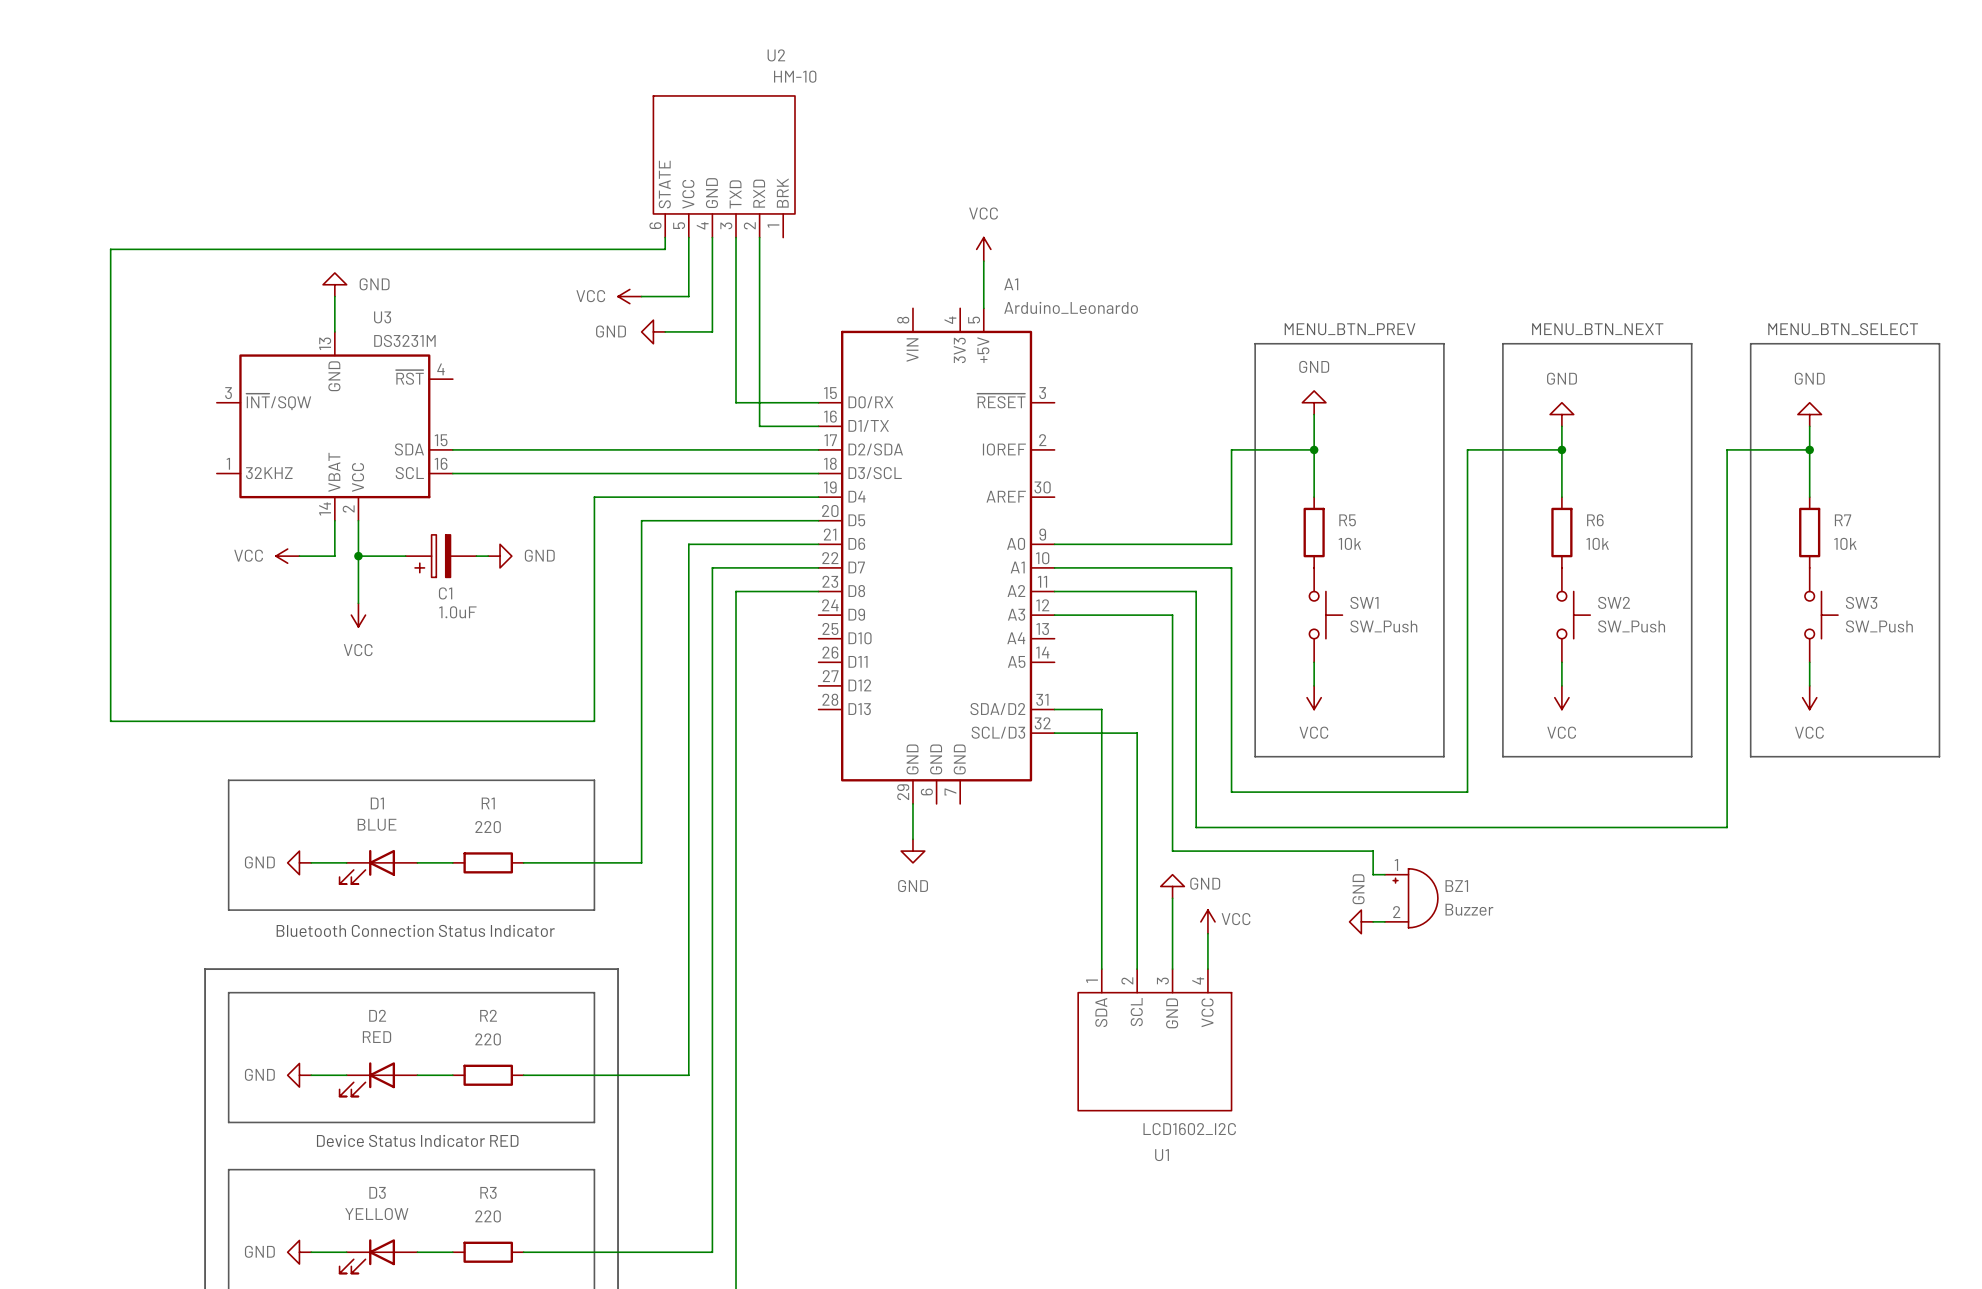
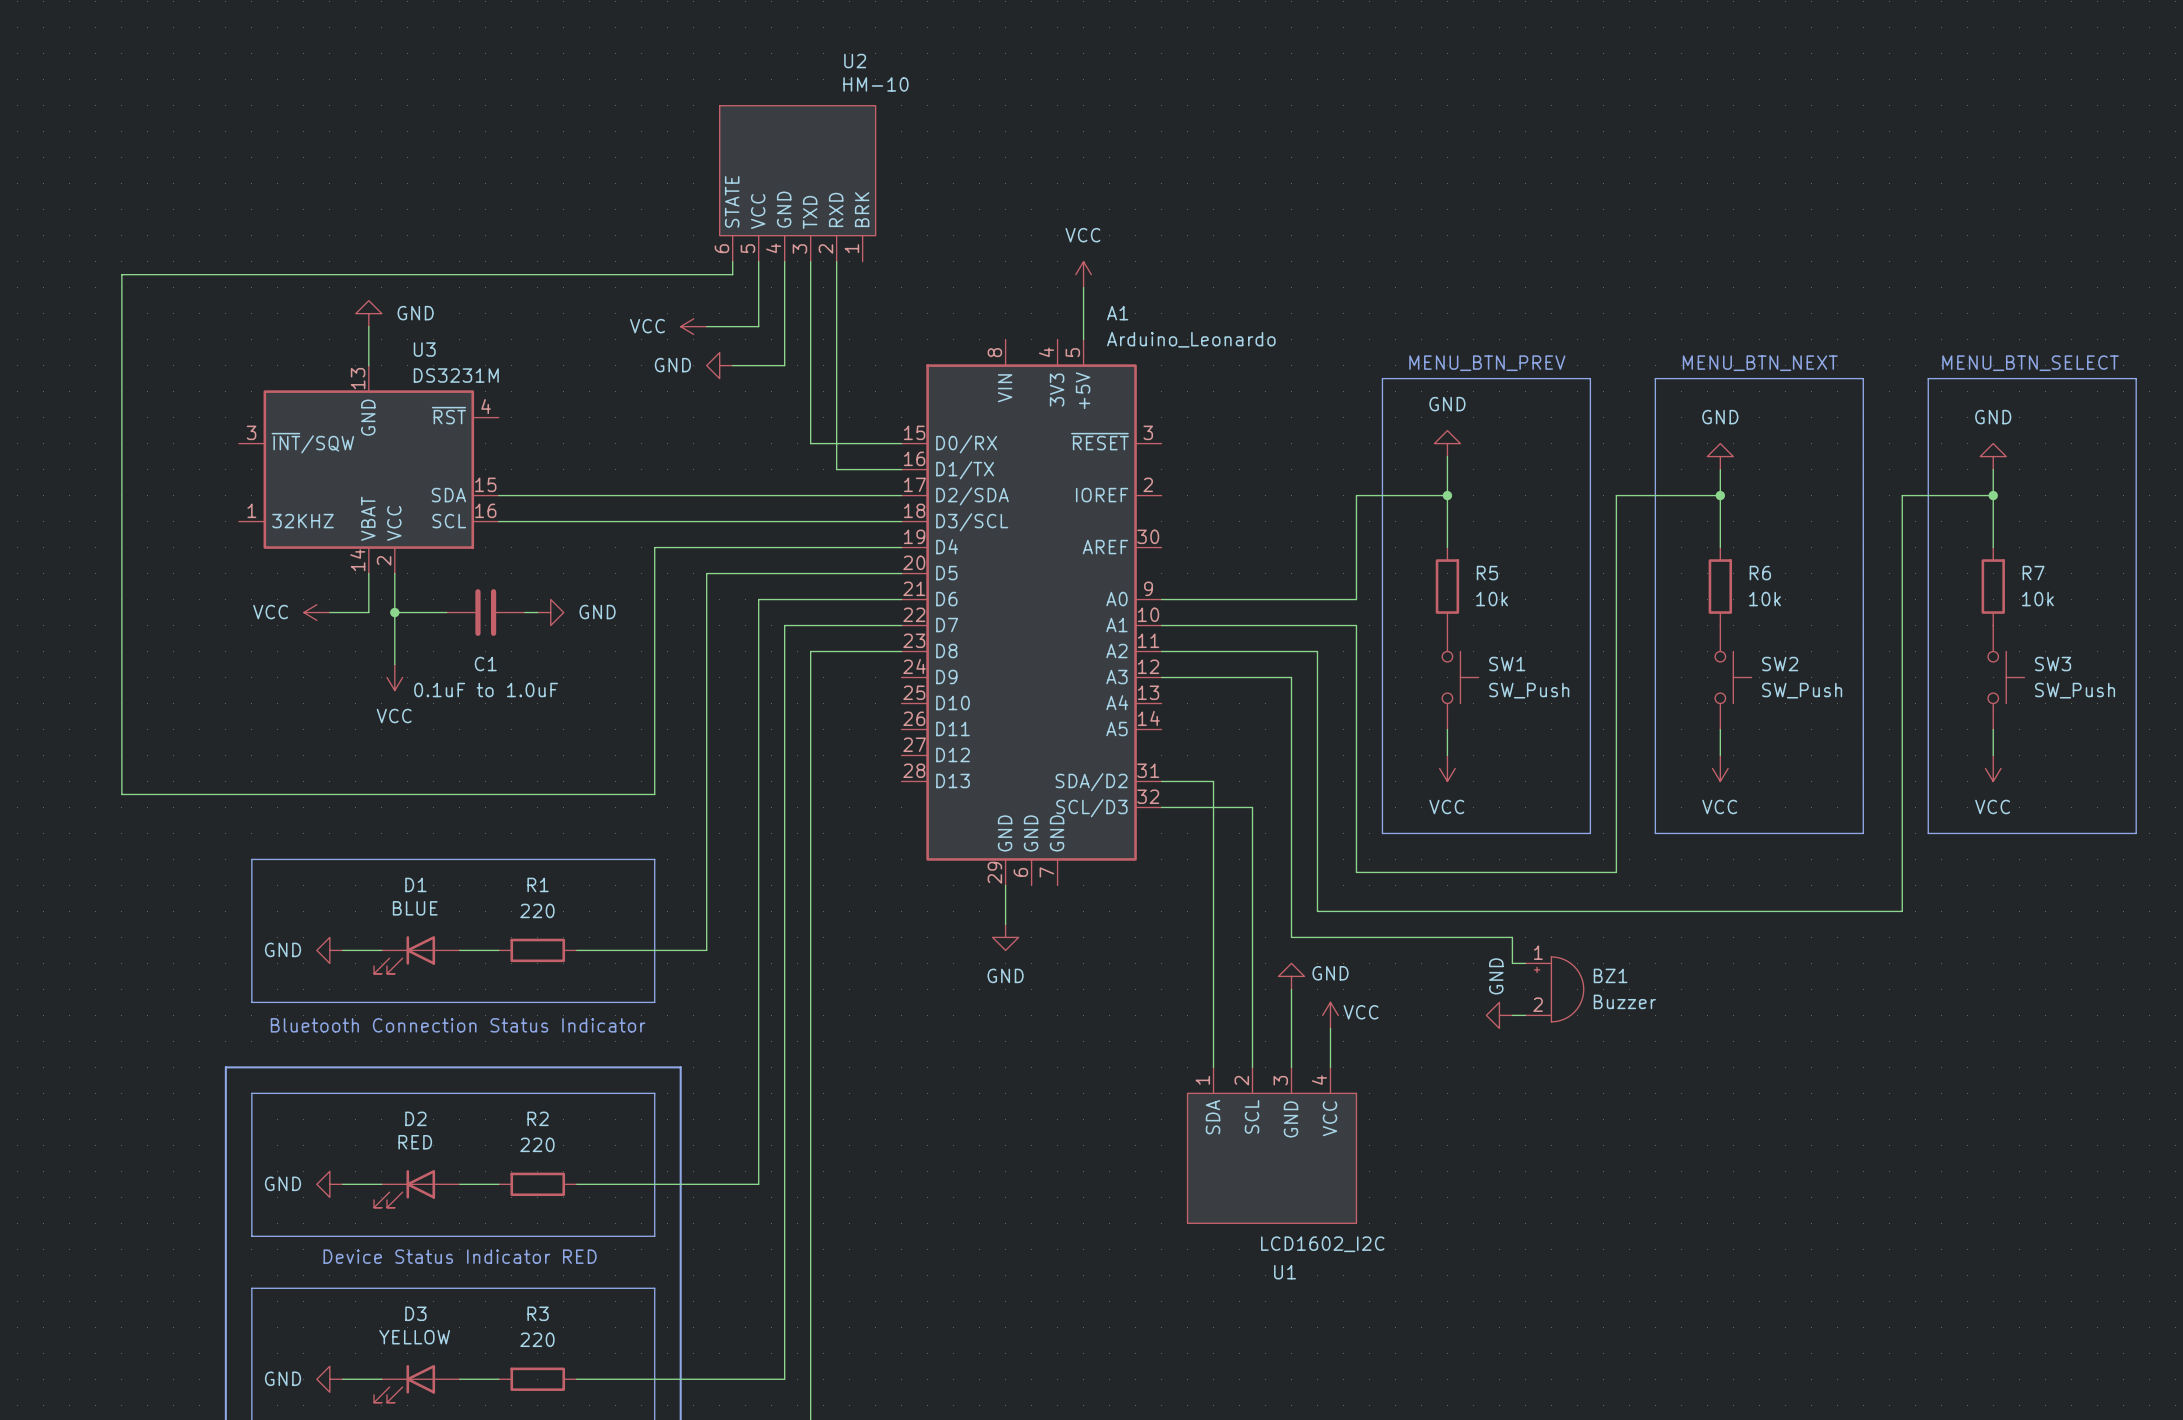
C1 symbol: [405, 534, 477, 578] -> [446, 589, 525, 636]
C1 value: 1.0uF (457, 612) -> 0.1uF to 1.0uF (486, 690)

